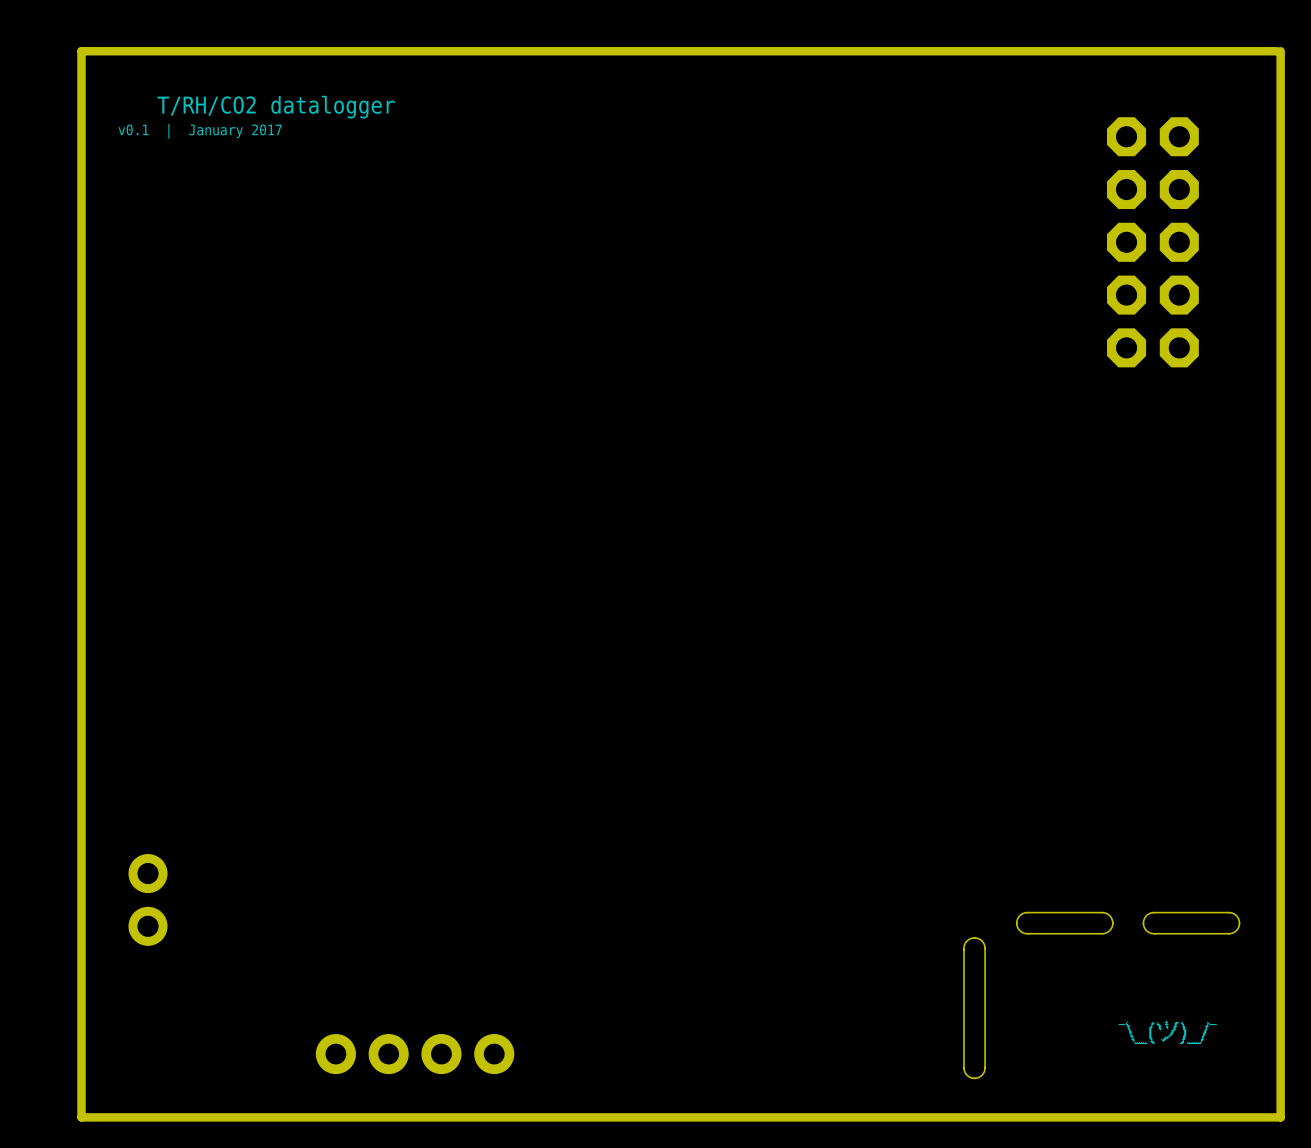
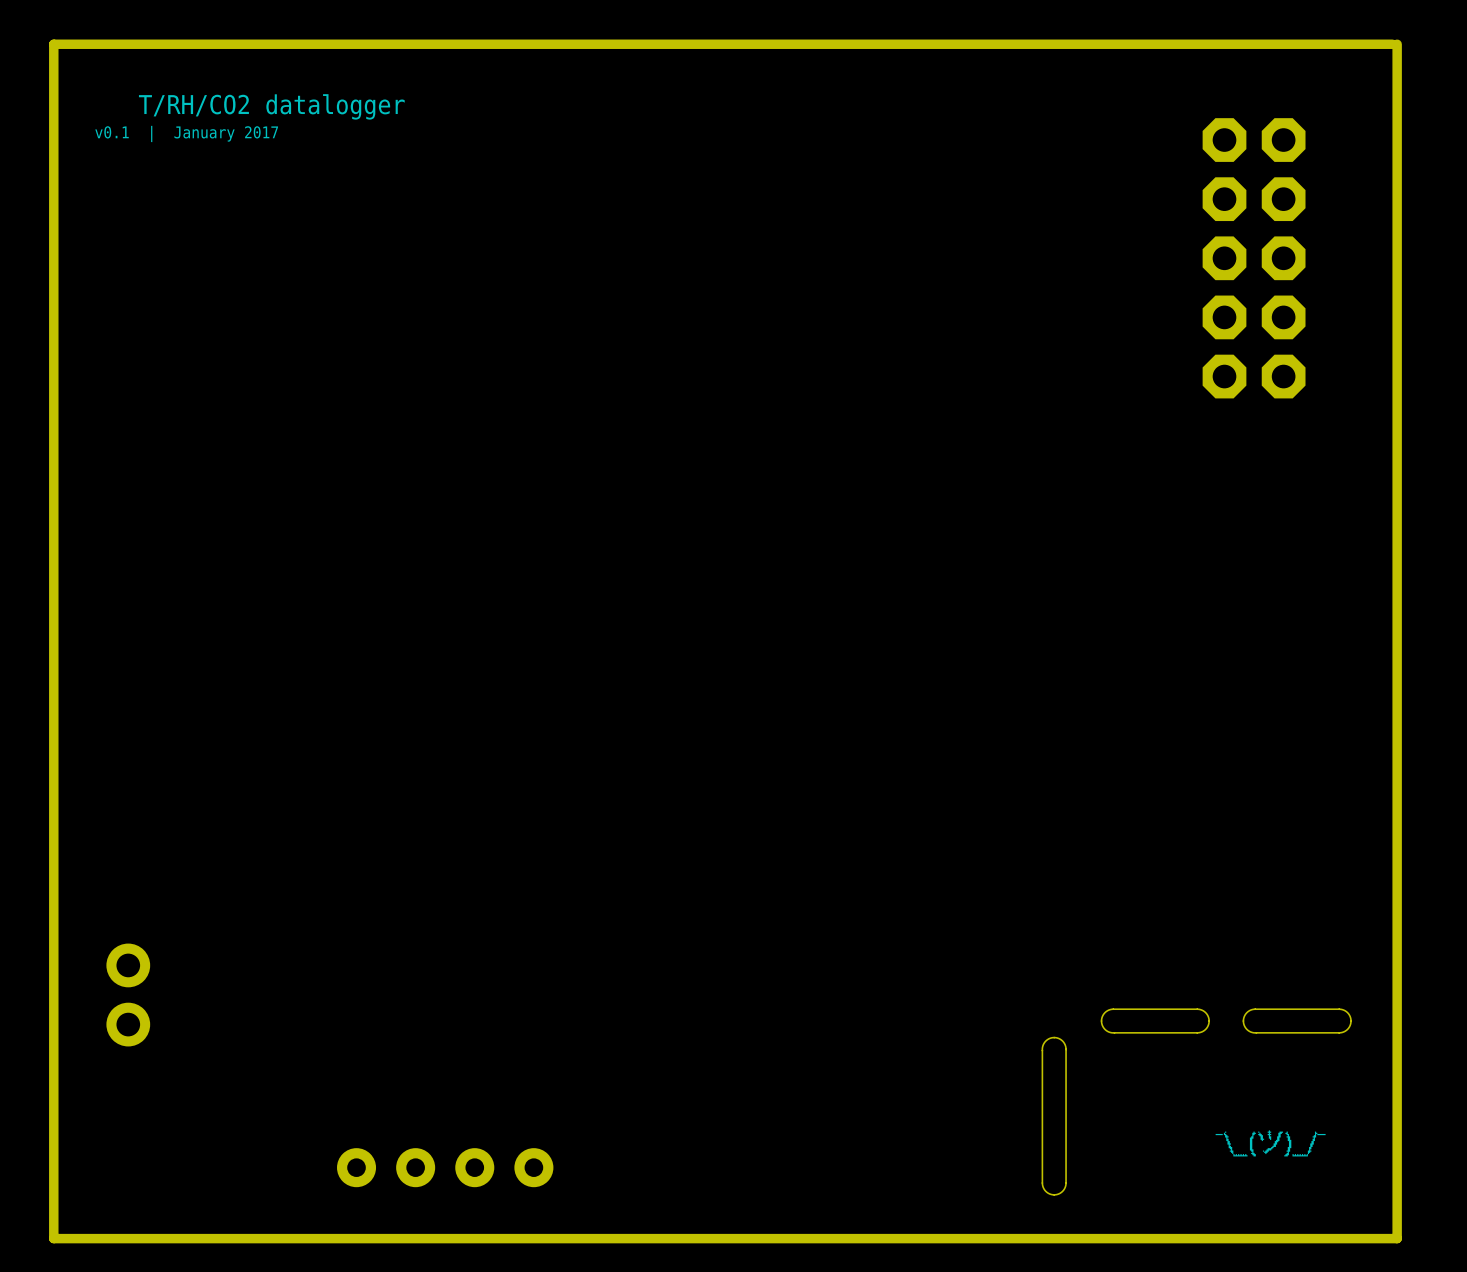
part footprint: [315, 1034, 515, 1075] -> [337, 1148, 554, 1188]

